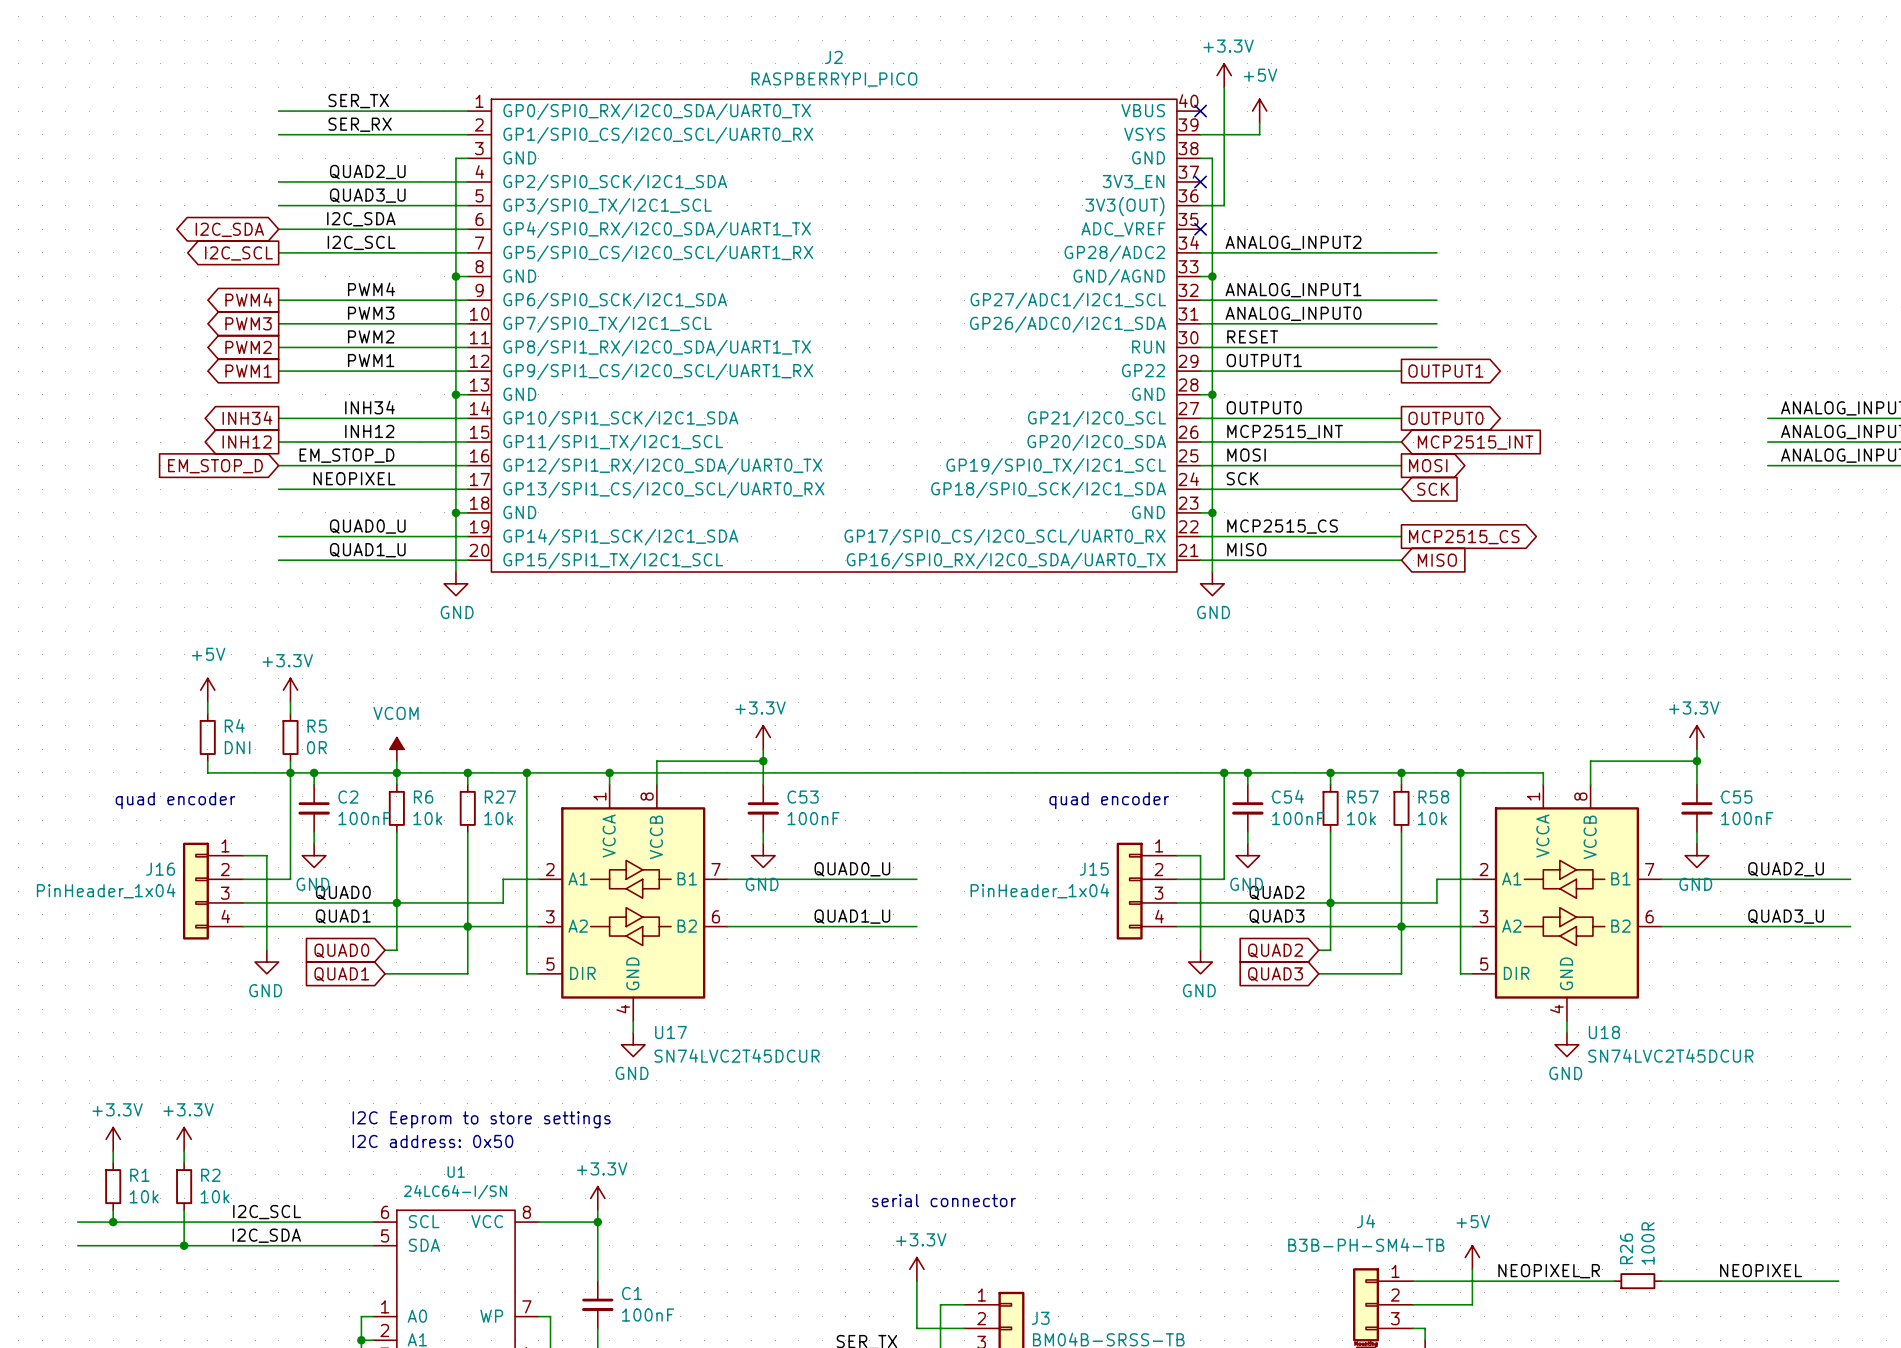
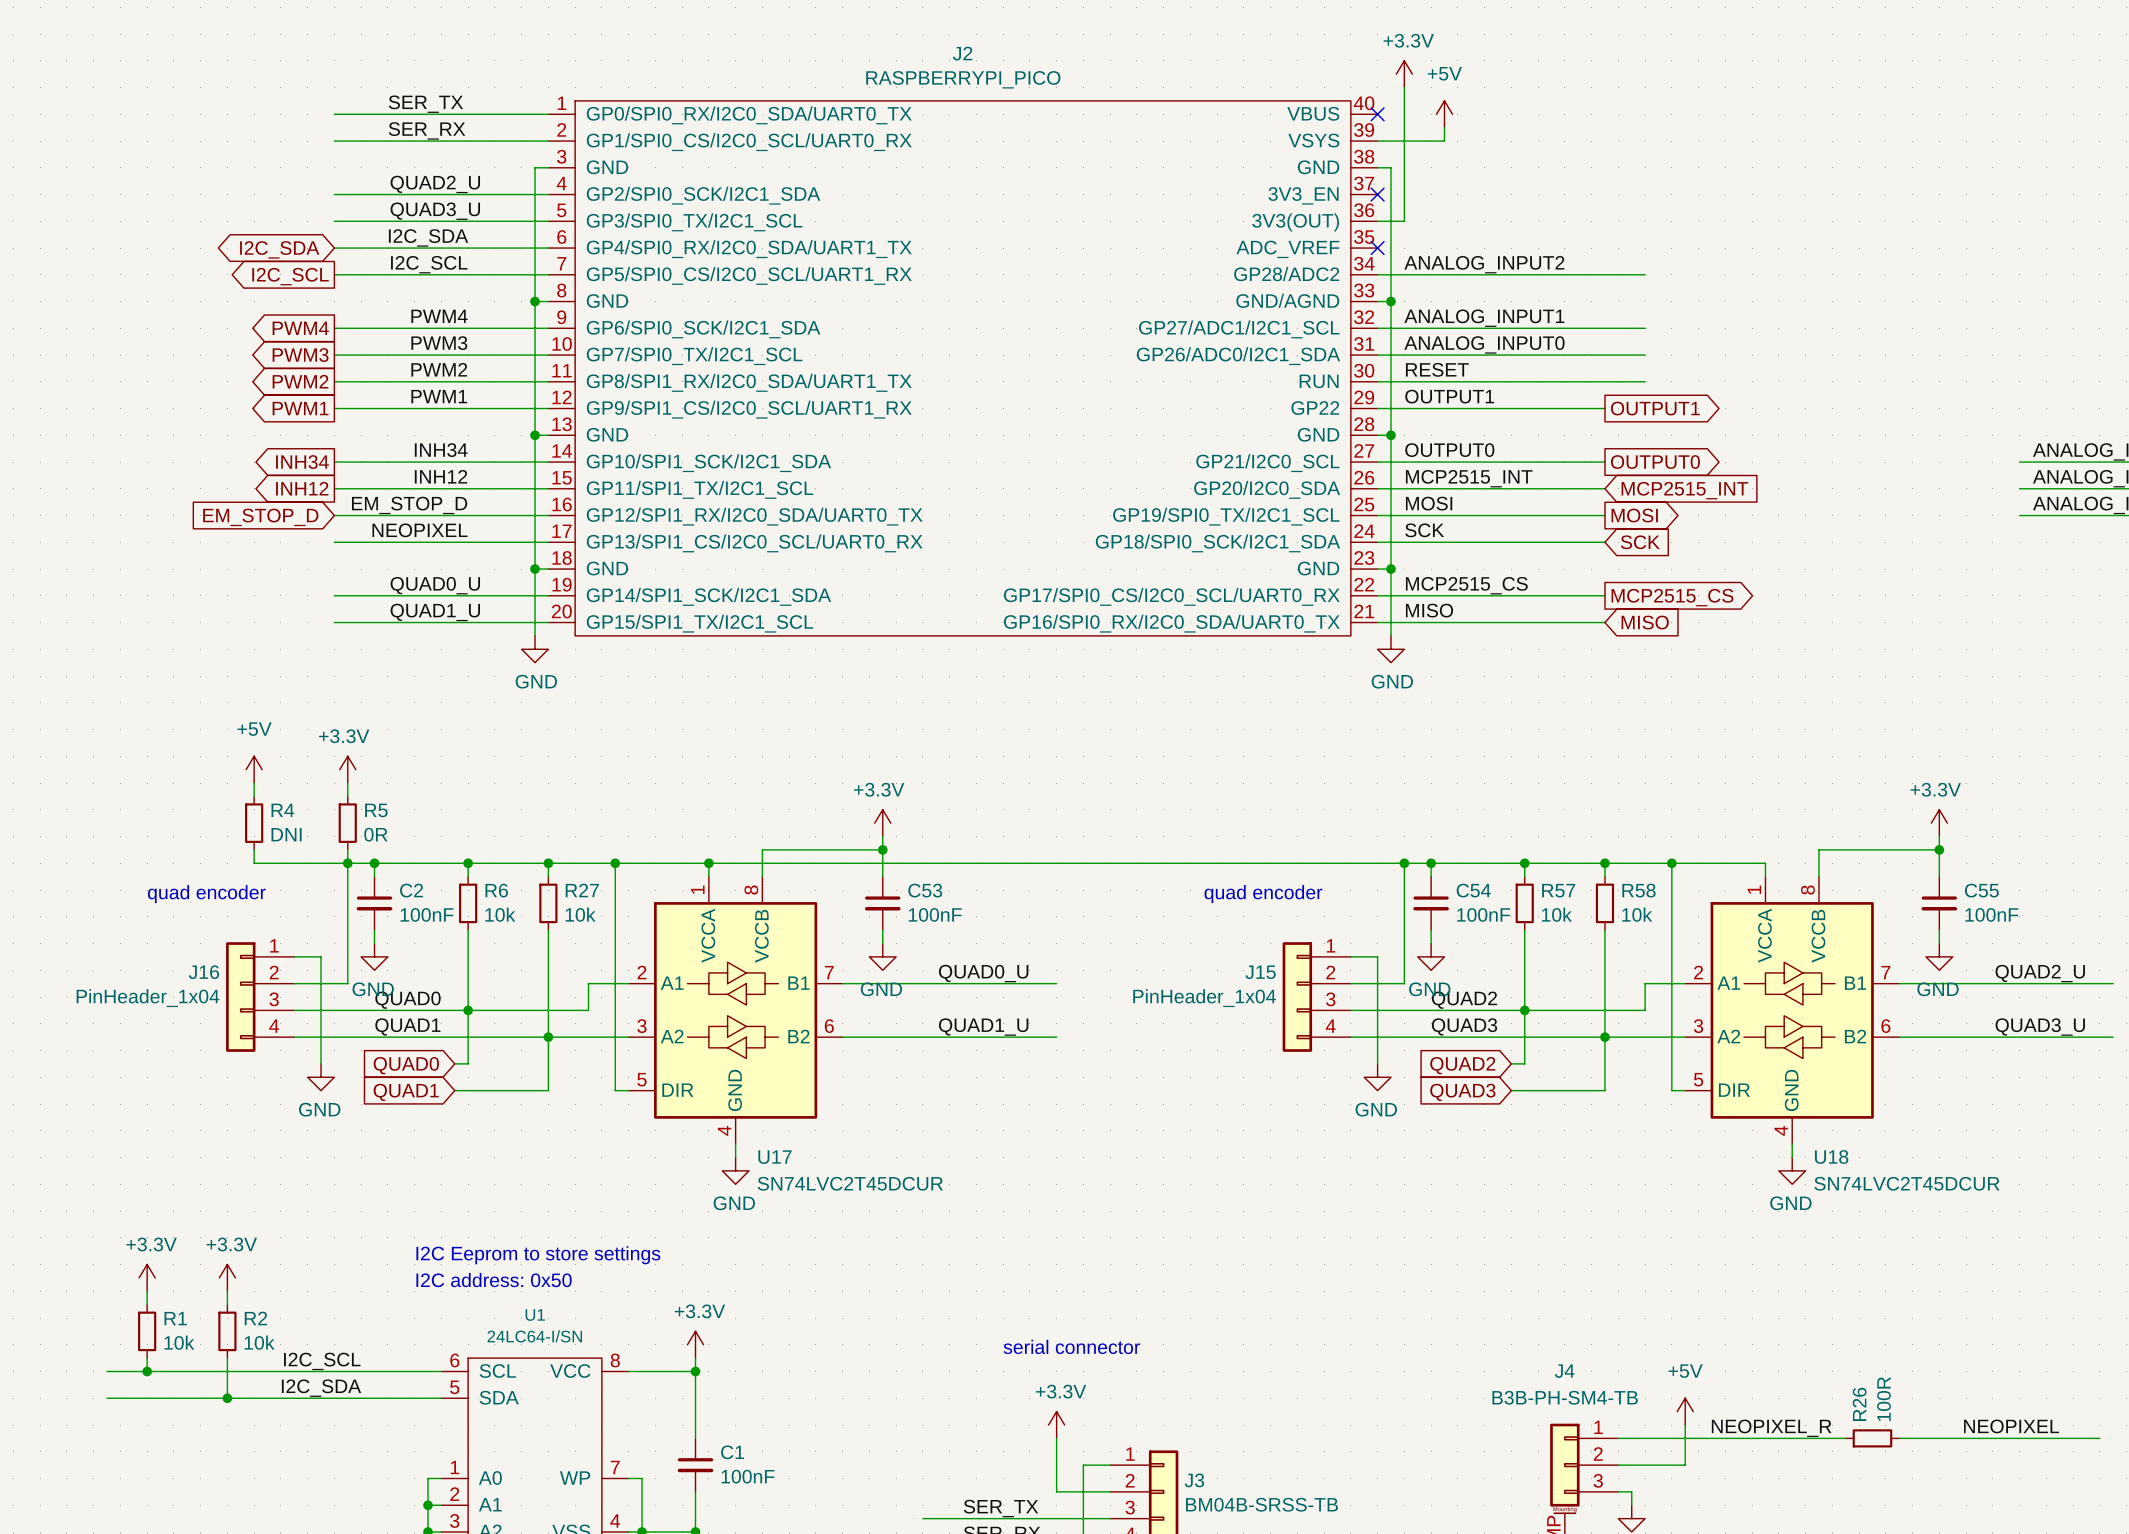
power symbol: VCOM (396, 749) -> none
wire: (396, 761) (396, 772) -> none

